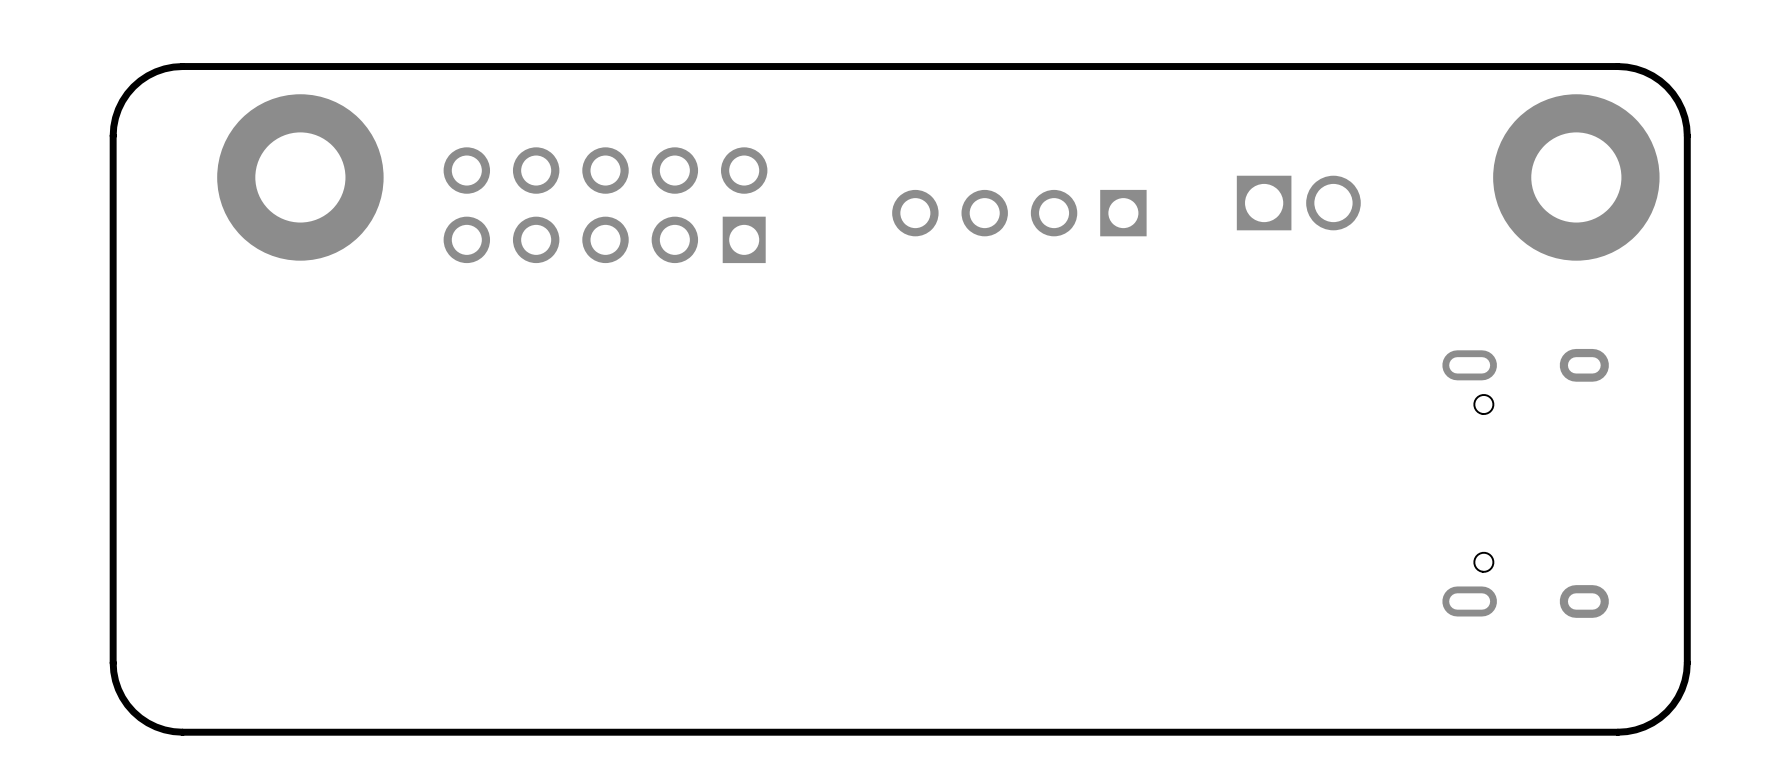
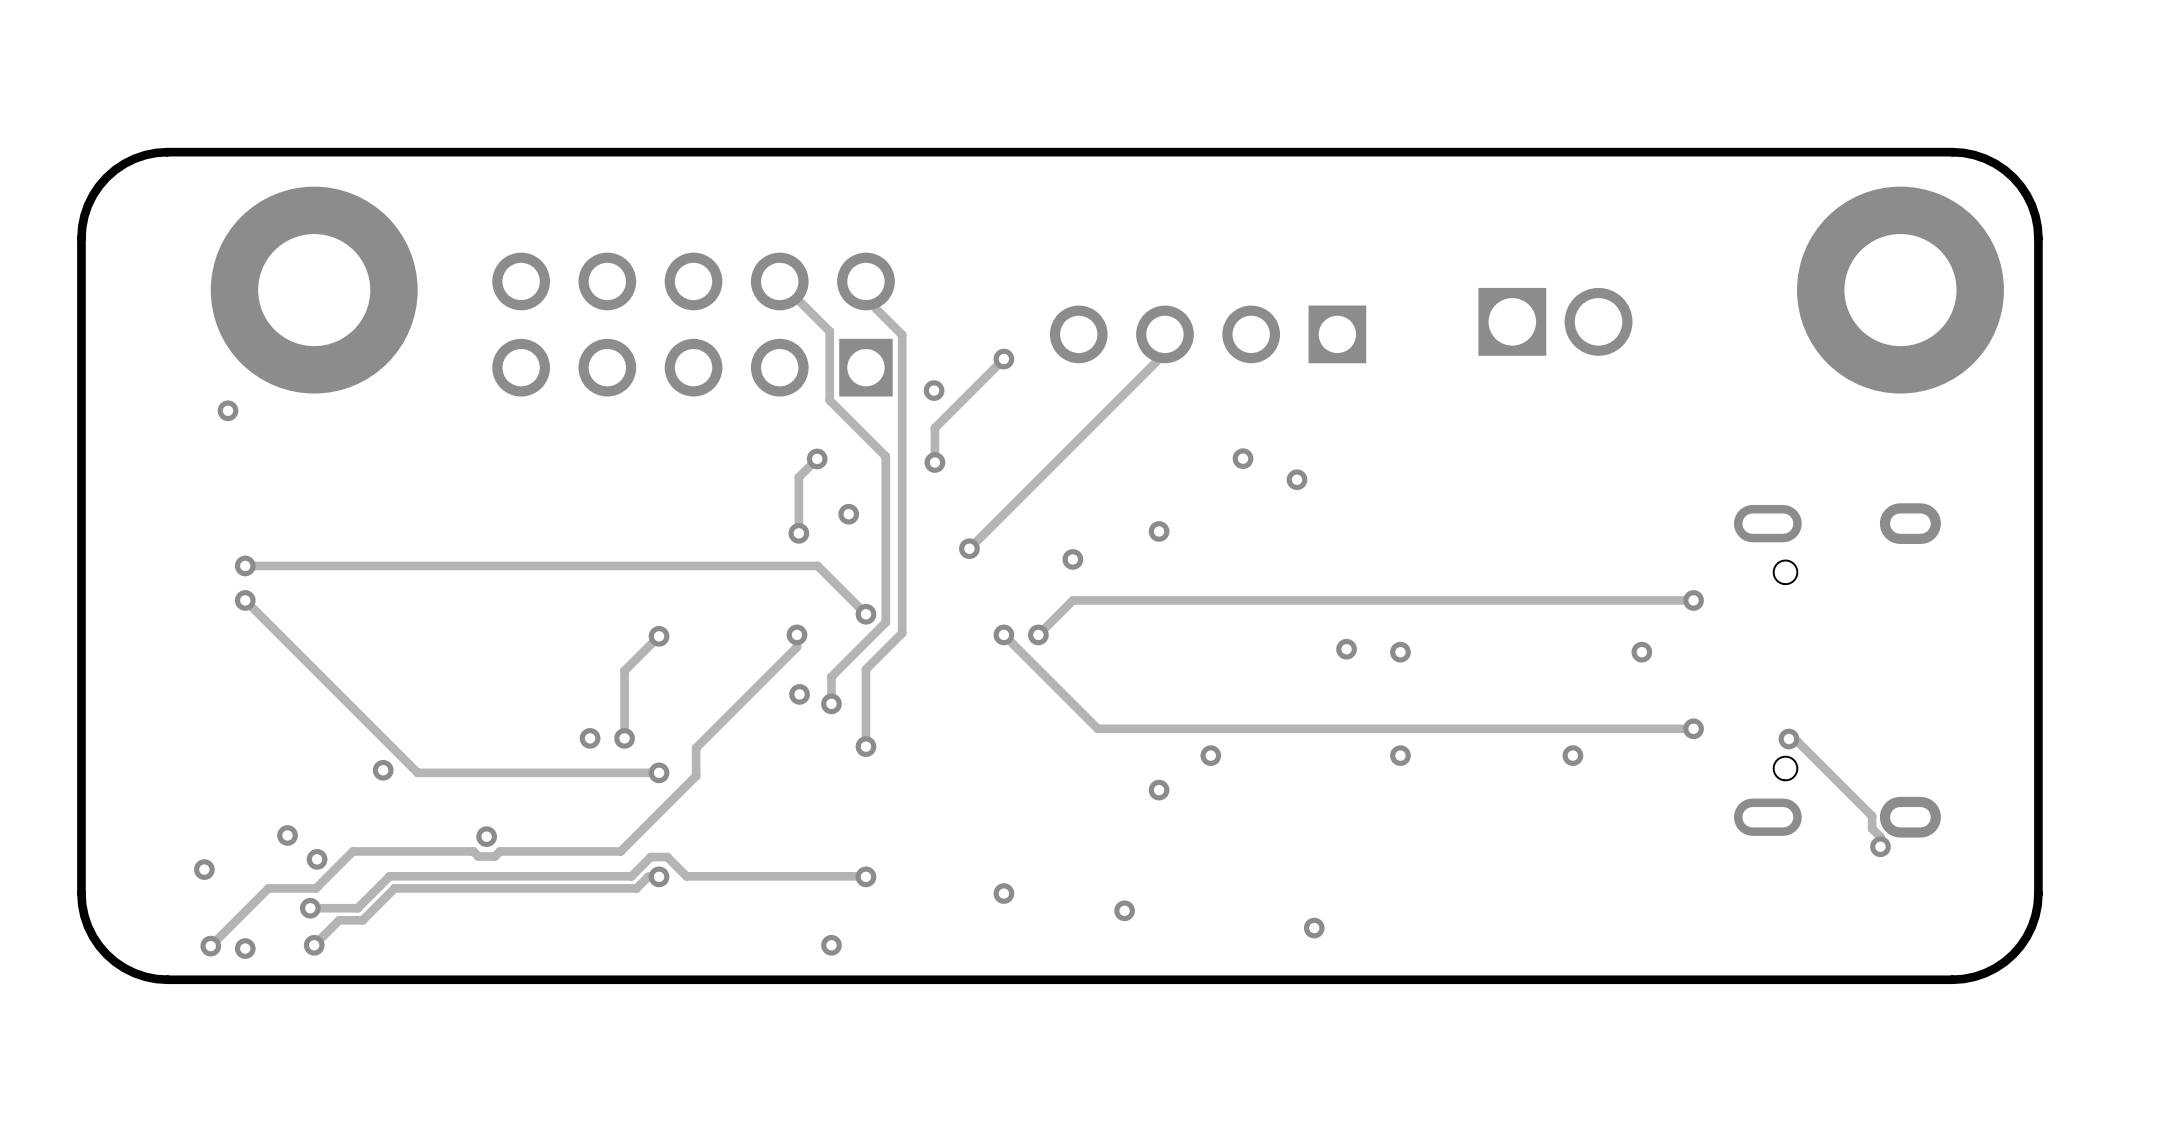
track: none -> (779, 281) (829, 331) (829, 400) (885, 456) (885, 622) (831, 676) (831, 703)
track: none -> (865, 281) (865, 298) (902, 334) (902, 633) (865, 669) (865, 746)
track: none -> (1163, 333) (1163, 354) (969, 548)
track: none -> (1003, 359) (934, 428) (934, 462)
via: none -> (1003, 359)
via: none -> (934, 390)
via: none -> (228, 410)
track: none -> (817, 458) (798, 477) (798, 533)
via: none -> (817, 458)
via: none -> (1243, 458)
via: none -> (934, 462)
via: none -> (1297, 479)
via: none -> (848, 514)
via: none -> (1159, 531)
via: none -> (798, 533)
via: none -> (969, 548)
via: none -> (1072, 559)
track: none -> (245, 565) (817, 565) (865, 614)
via: none -> (245, 565)
track: none -> (245, 600) (417, 772) (659, 772)
via: none -> (245, 600)
track: none -> (1693, 600) (1072, 600) (1038, 634)
via: none -> (1693, 600)
via: none -> (865, 614)
track: none -> (797, 634) (797, 647) (696, 747) (696, 776) (620, 851) (499, 851) (494, 856) (478, 856) (473, 851) (353, 851) (316, 888) (268, 888) (210, 946)
via: none -> (797, 634)
track: none -> (1003, 634) (1097, 728) (1693, 728)
via: none -> (1003, 634)
via: none -> (1038, 634)
track: none -> (659, 636) (624, 670) (624, 738)
via: none -> (659, 636)
via: none -> (1346, 649)
via: none -> (1400, 652)
via: none -> (1641, 652)
via: none -> (799, 694)
via: none -> (831, 703)
via: none -> (1693, 728)
via: none -> (590, 738)
via: none -> (624, 738)
track: none -> (1788, 739) (1791, 741) (1797, 741) (1872, 816) (1872, 828) (1880, 836) (1880, 846)
via: none -> (1788, 739)
via: none -> (865, 746)
via: none -> (1210, 755)
via: none -> (1400, 755)
via: none -> (1572, 755)
via: none -> (383, 770)
via: none -> (659, 772)
via: none -> (1159, 790)
via: none -> (287, 835)
via: none -> (486, 836)
via: none -> (1880, 846)
via: none -> (317, 859)
via: none -> (204, 869)
track: none -> (659, 876) (648, 876) (636, 888) (394, 888) (362, 920) (339, 920) (314, 945)
via: none -> (659, 876)
track: none -> (865, 876) (686, 876) (667, 857) (650, 857) (631, 876) (389, 876) (357, 908) (310, 908)
via: none -> (865, 876)
via: none -> (1003, 893)
via: none -> (310, 908)
via: none -> (1124, 910)
via: none -> (1314, 928)
via: none -> (314, 945)
via: none -> (831, 945)
via: none -> (210, 946)
via: none -> (245, 948)

